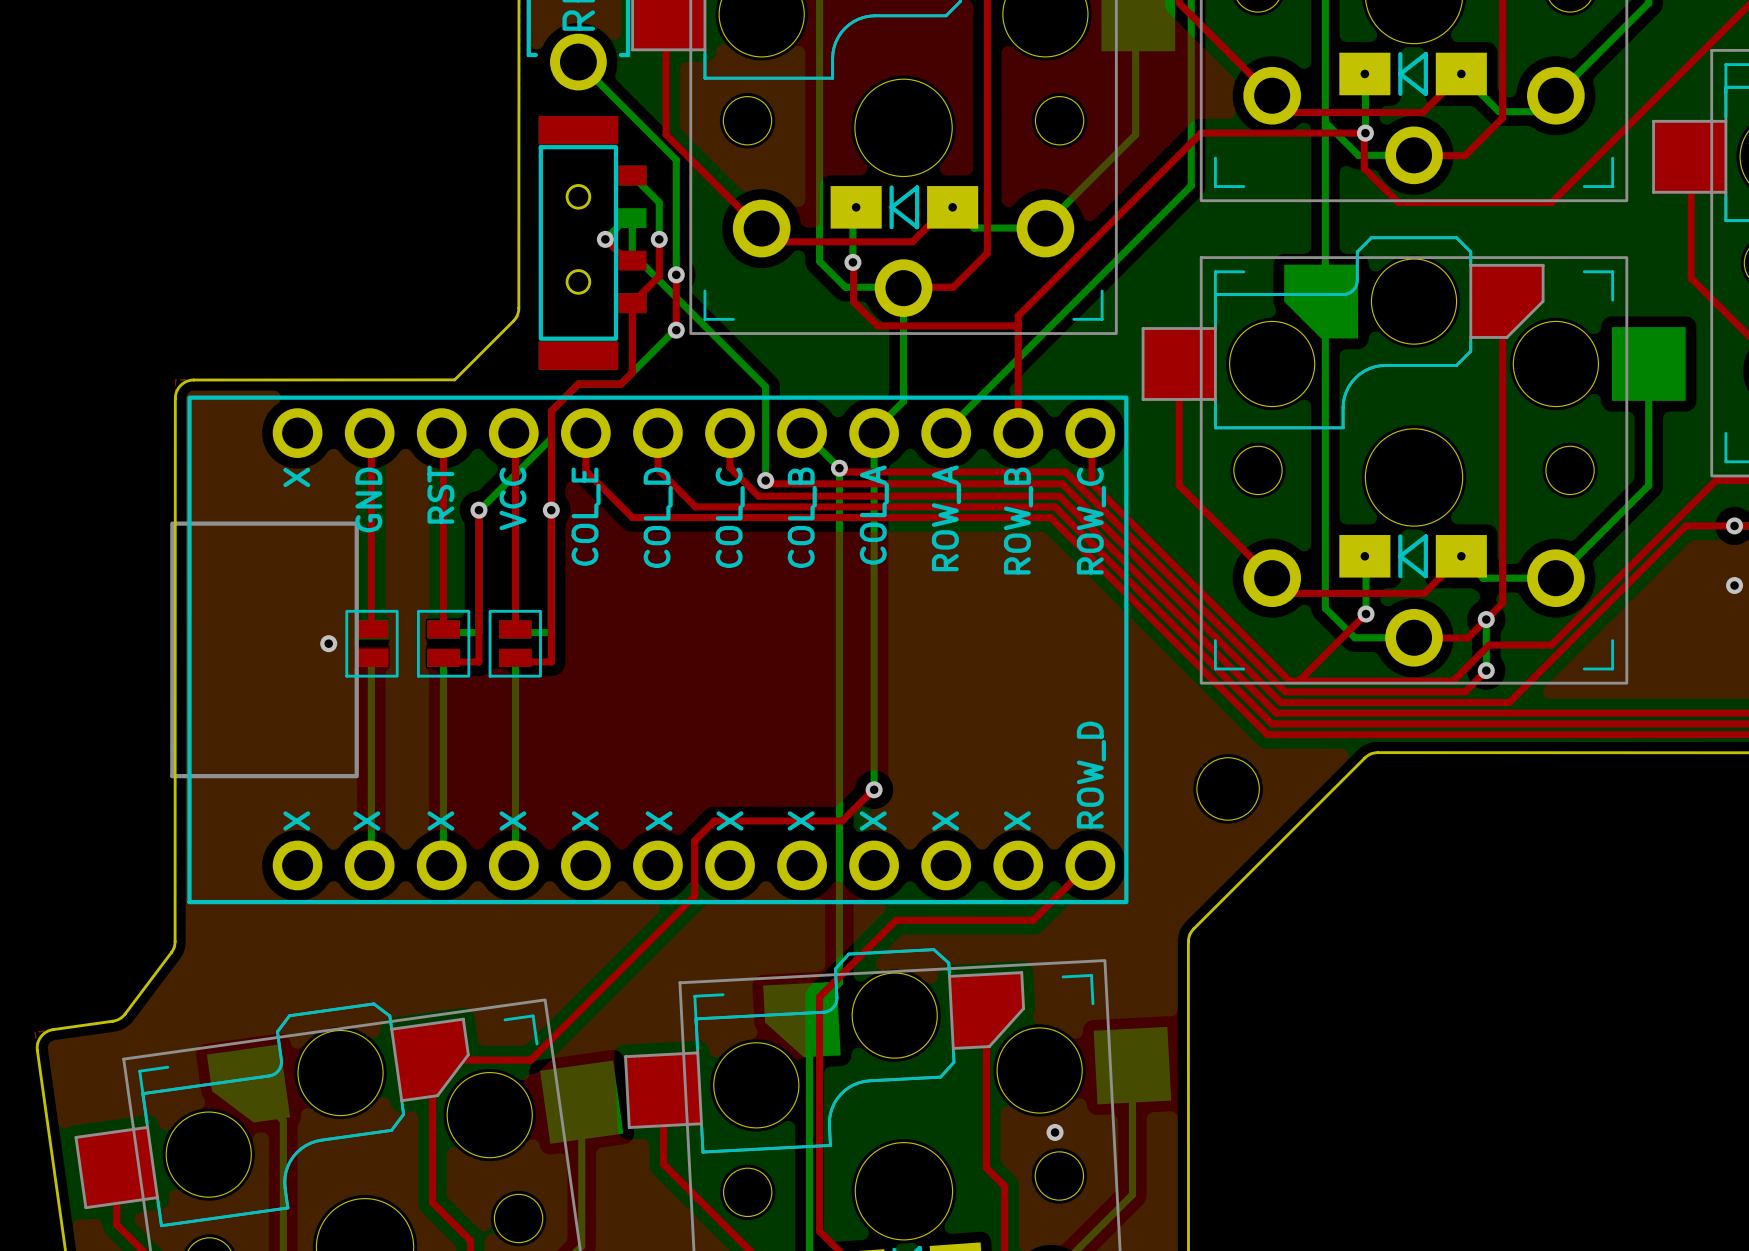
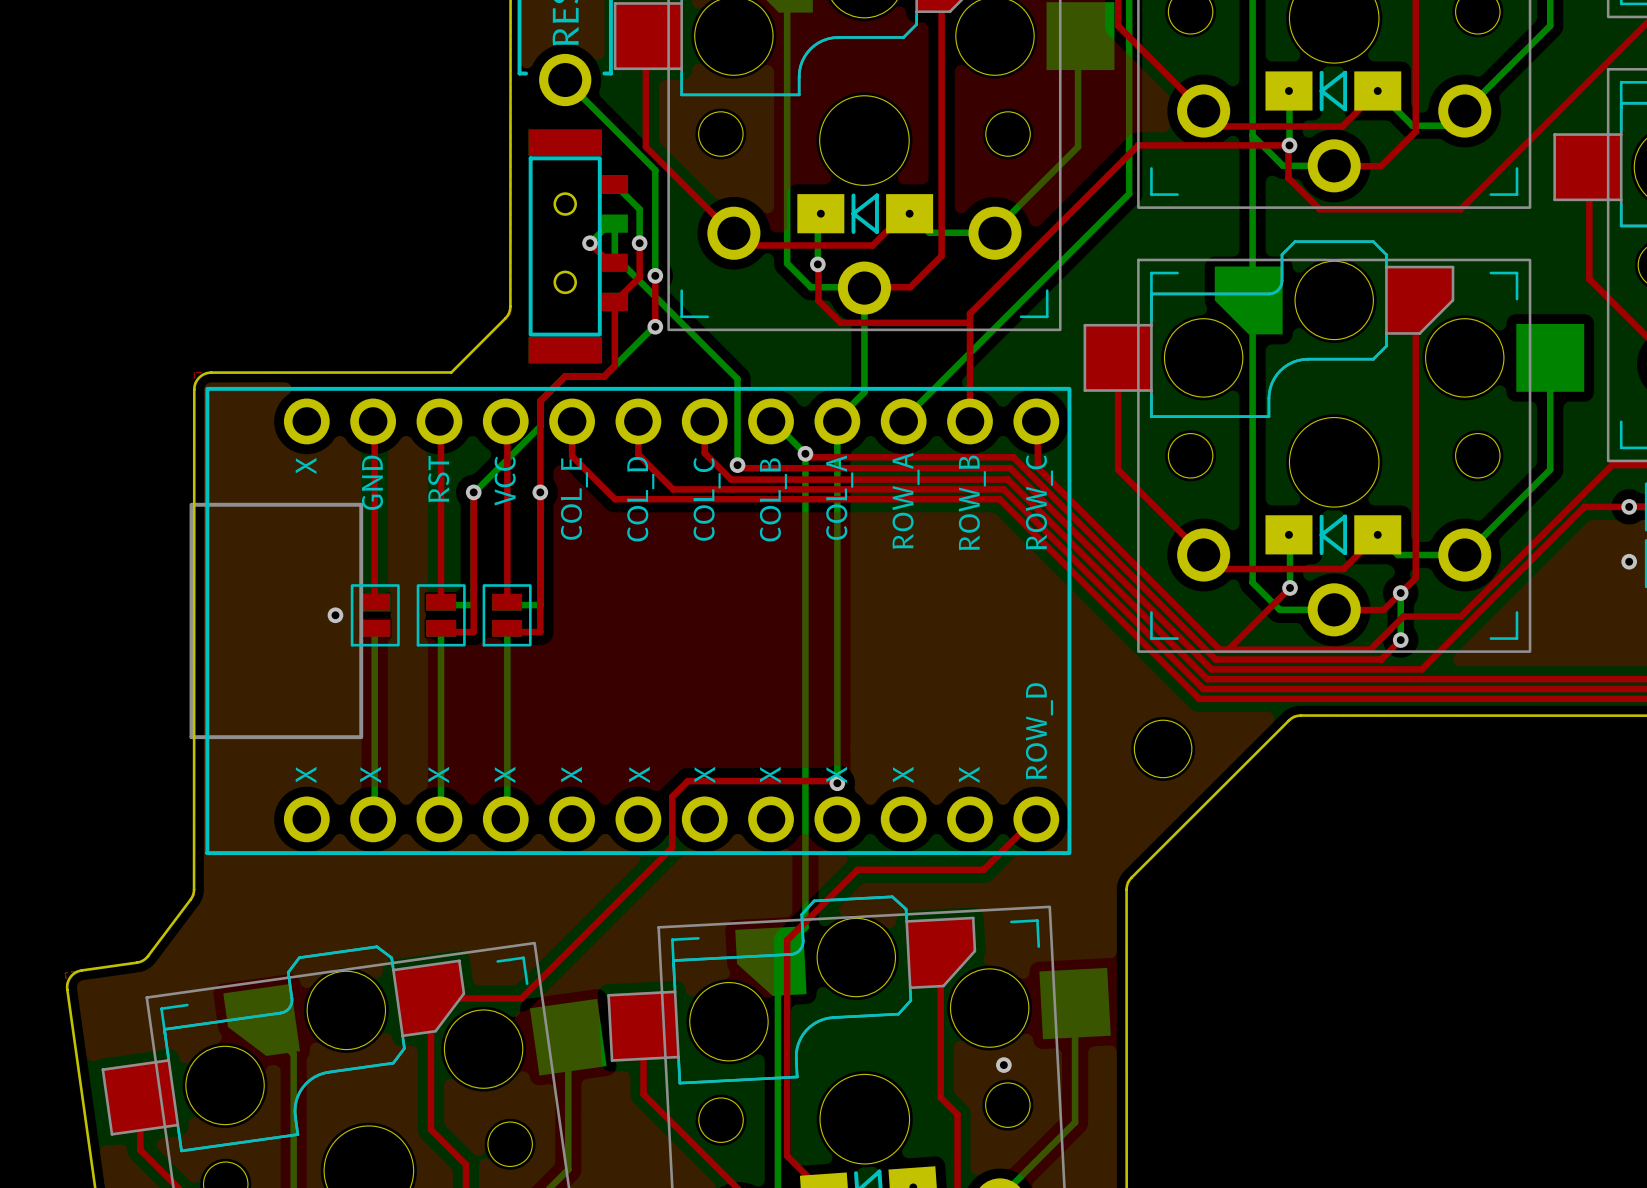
top track: (874, 789) (842, 821) (714, 821) (711, 823) -> (837, 783) (835, 781) (687, 781)
bottom track: none -> (837, 749) (837, 783)
via position: (874, 789) -> (837, 783)

